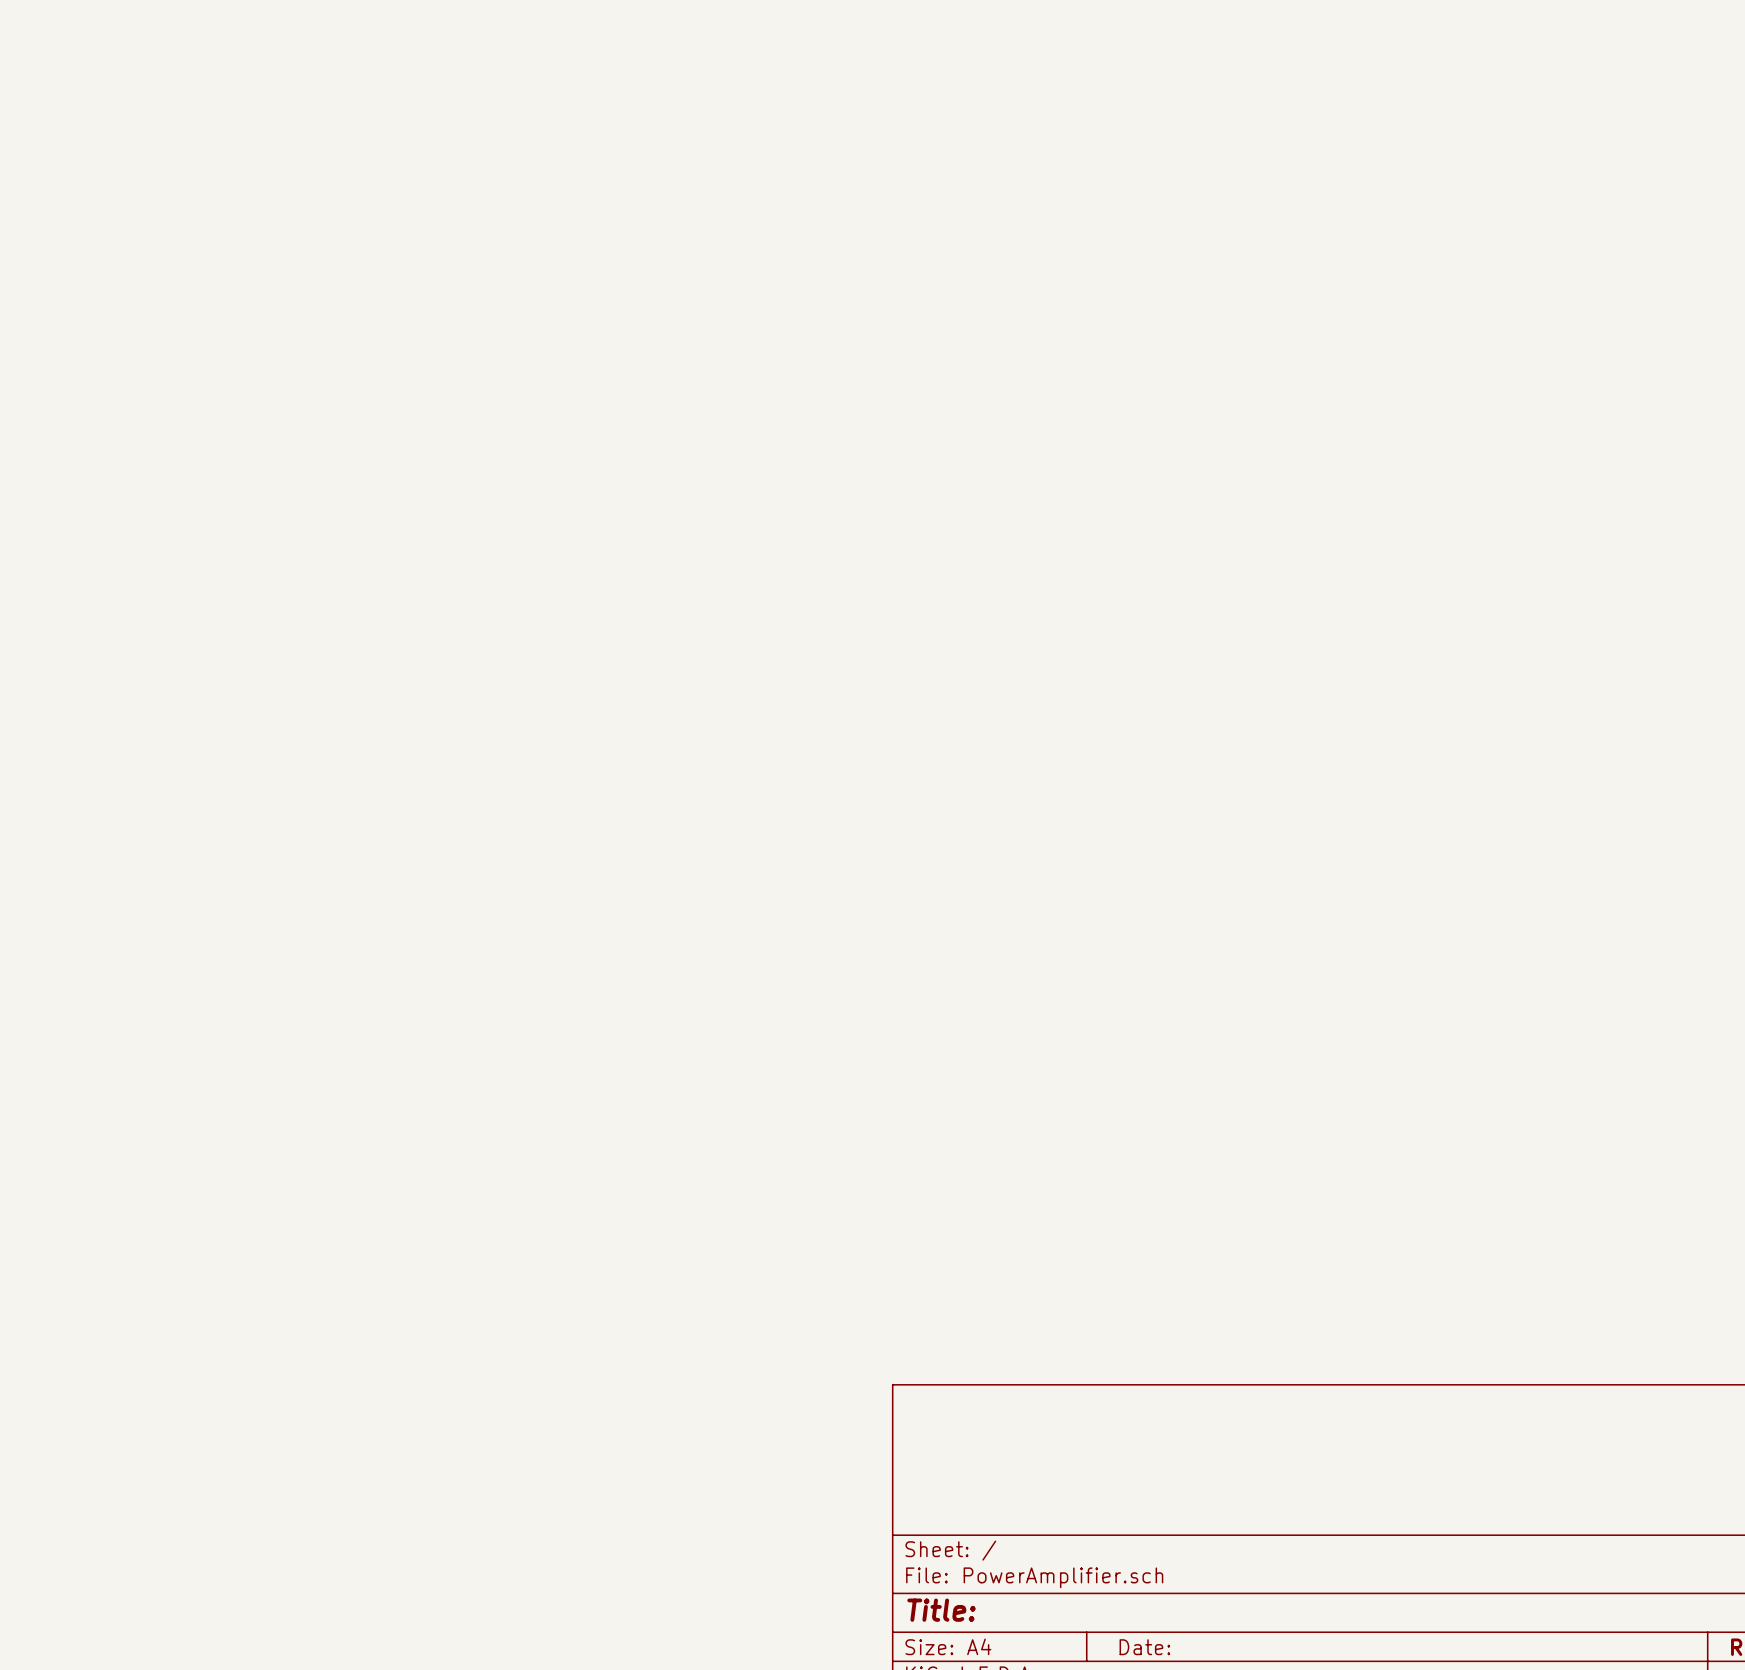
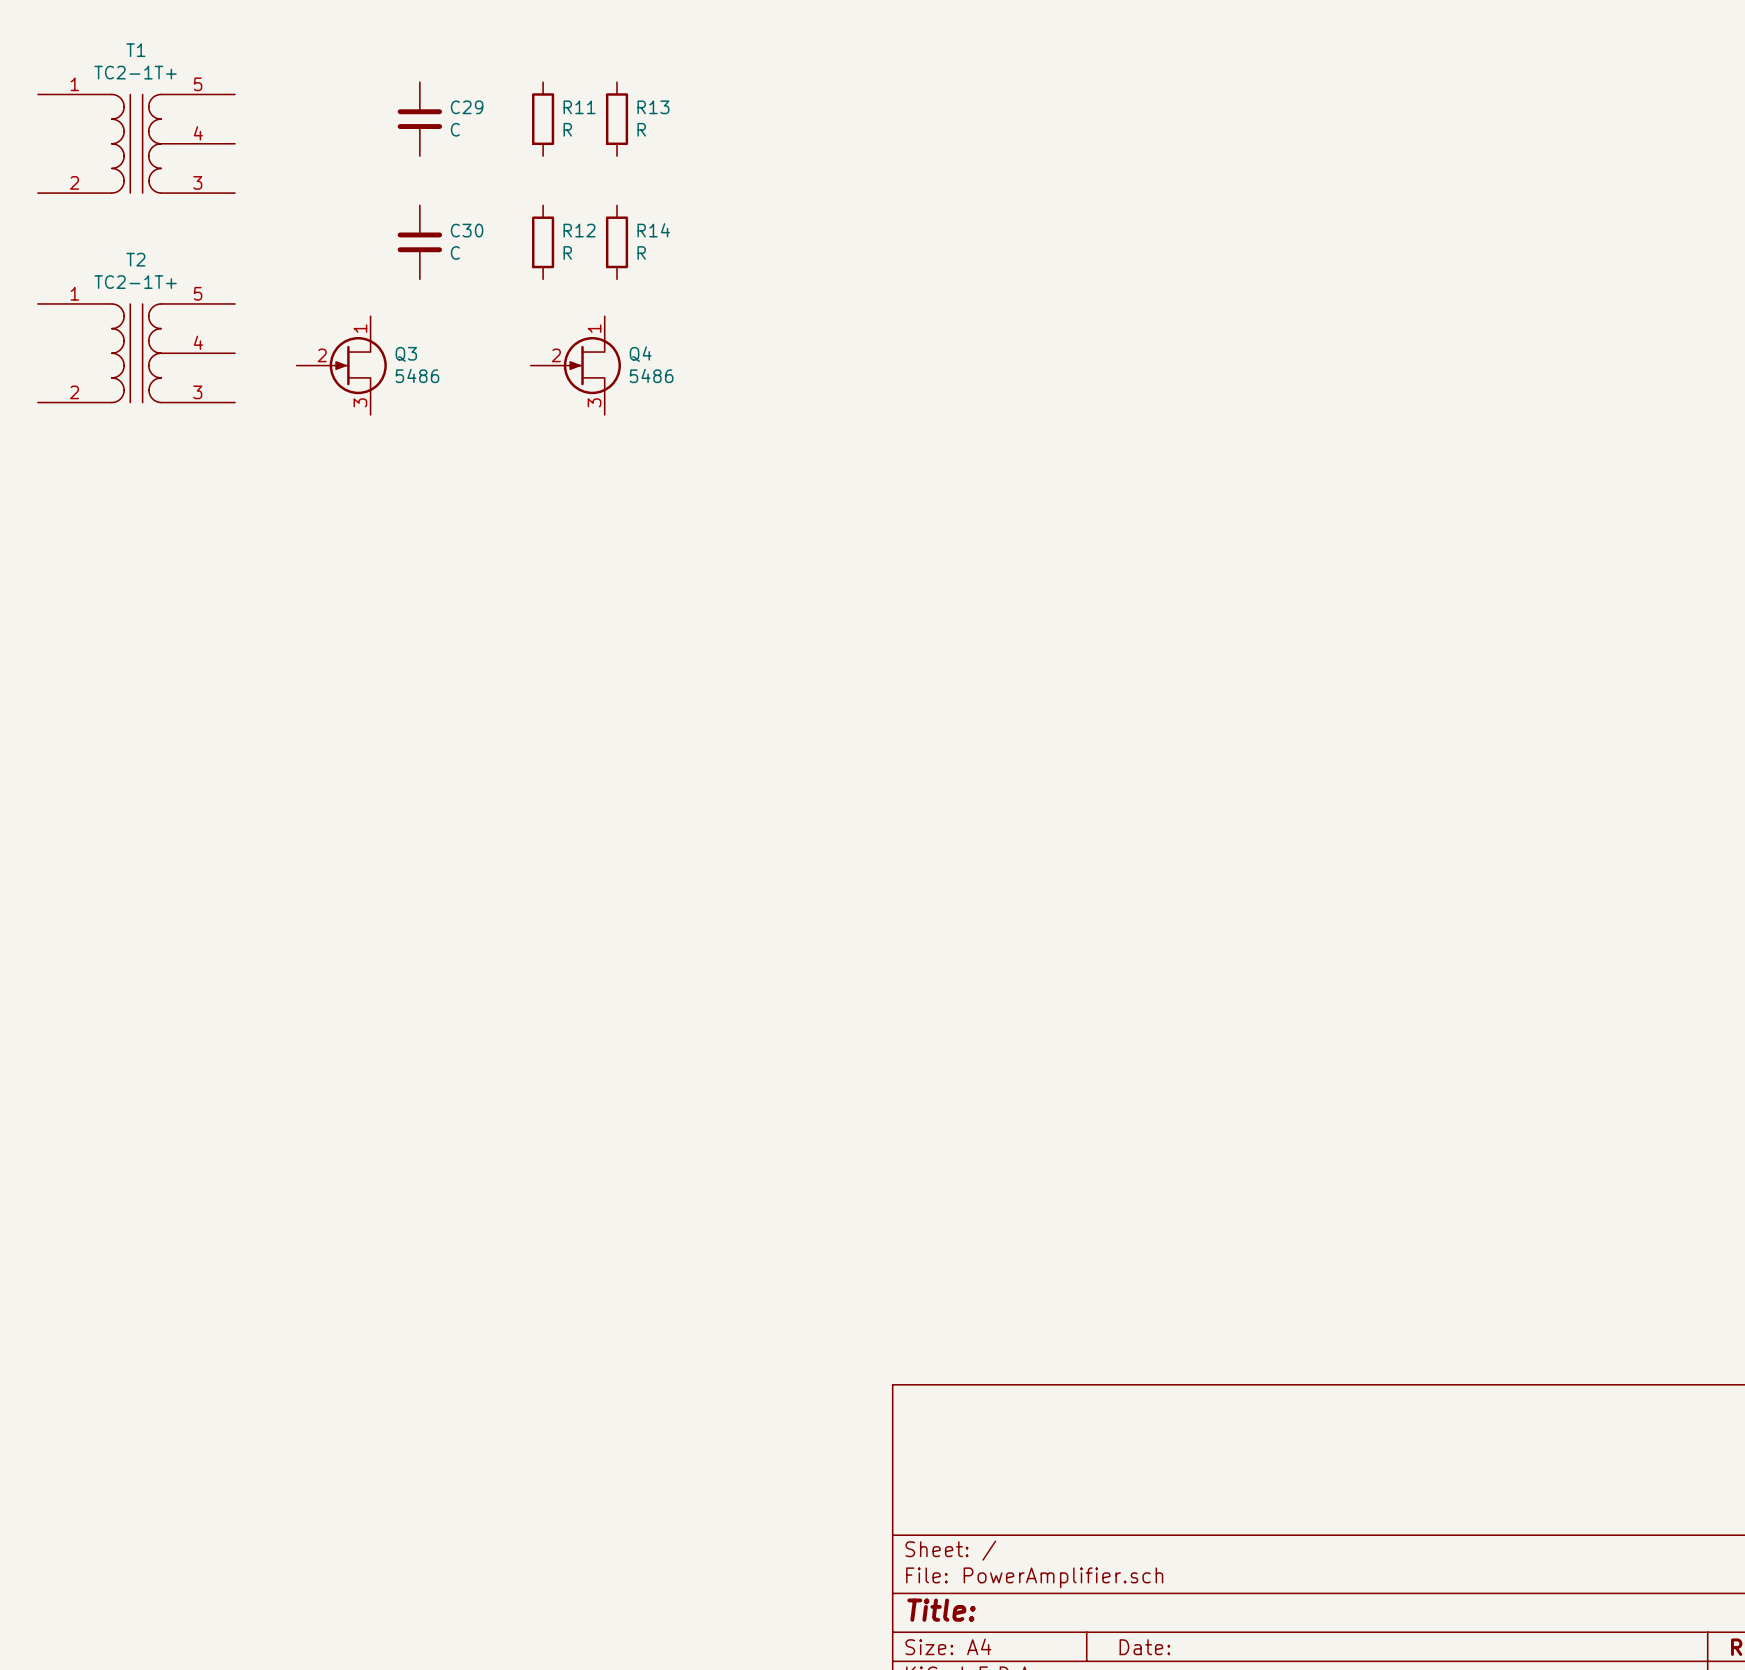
C29: none -> C (419, 119)
R11: none -> R (543, 119)
R13: none -> R (617, 119)
T1: none -> TC2-1T+ (136, 143)
C30: none -> C (419, 242)
R12: none -> R (543, 242)
R14: none -> R (617, 242)
T2: none -> TC2-1T+ (136, 353)
Q3: none -> 5486 (341, 365)
Q4: none -> 5486 (575, 365)

